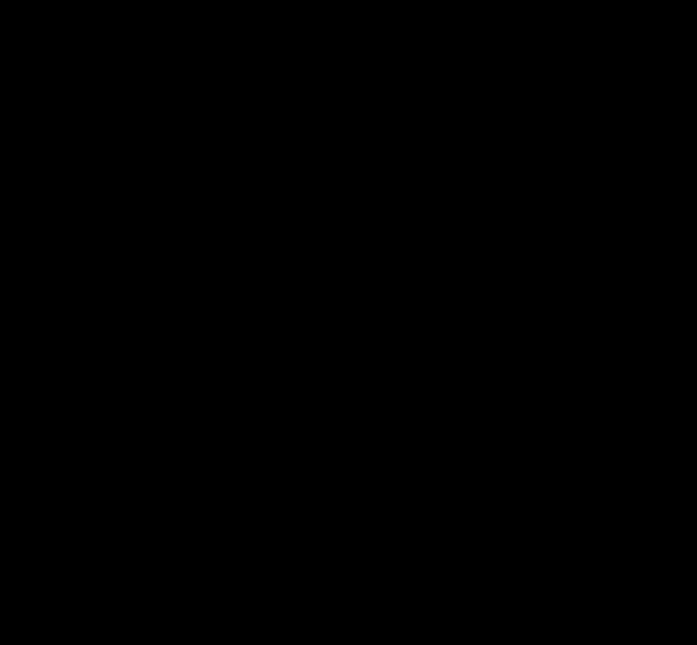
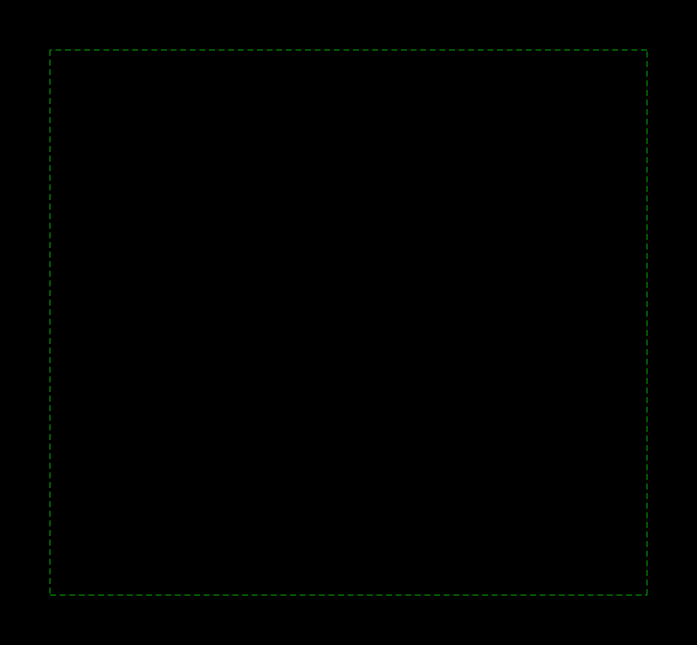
zone outline: none -> (647, 49) (49, 49) (49, 595) (647, 595) (647, 49)

